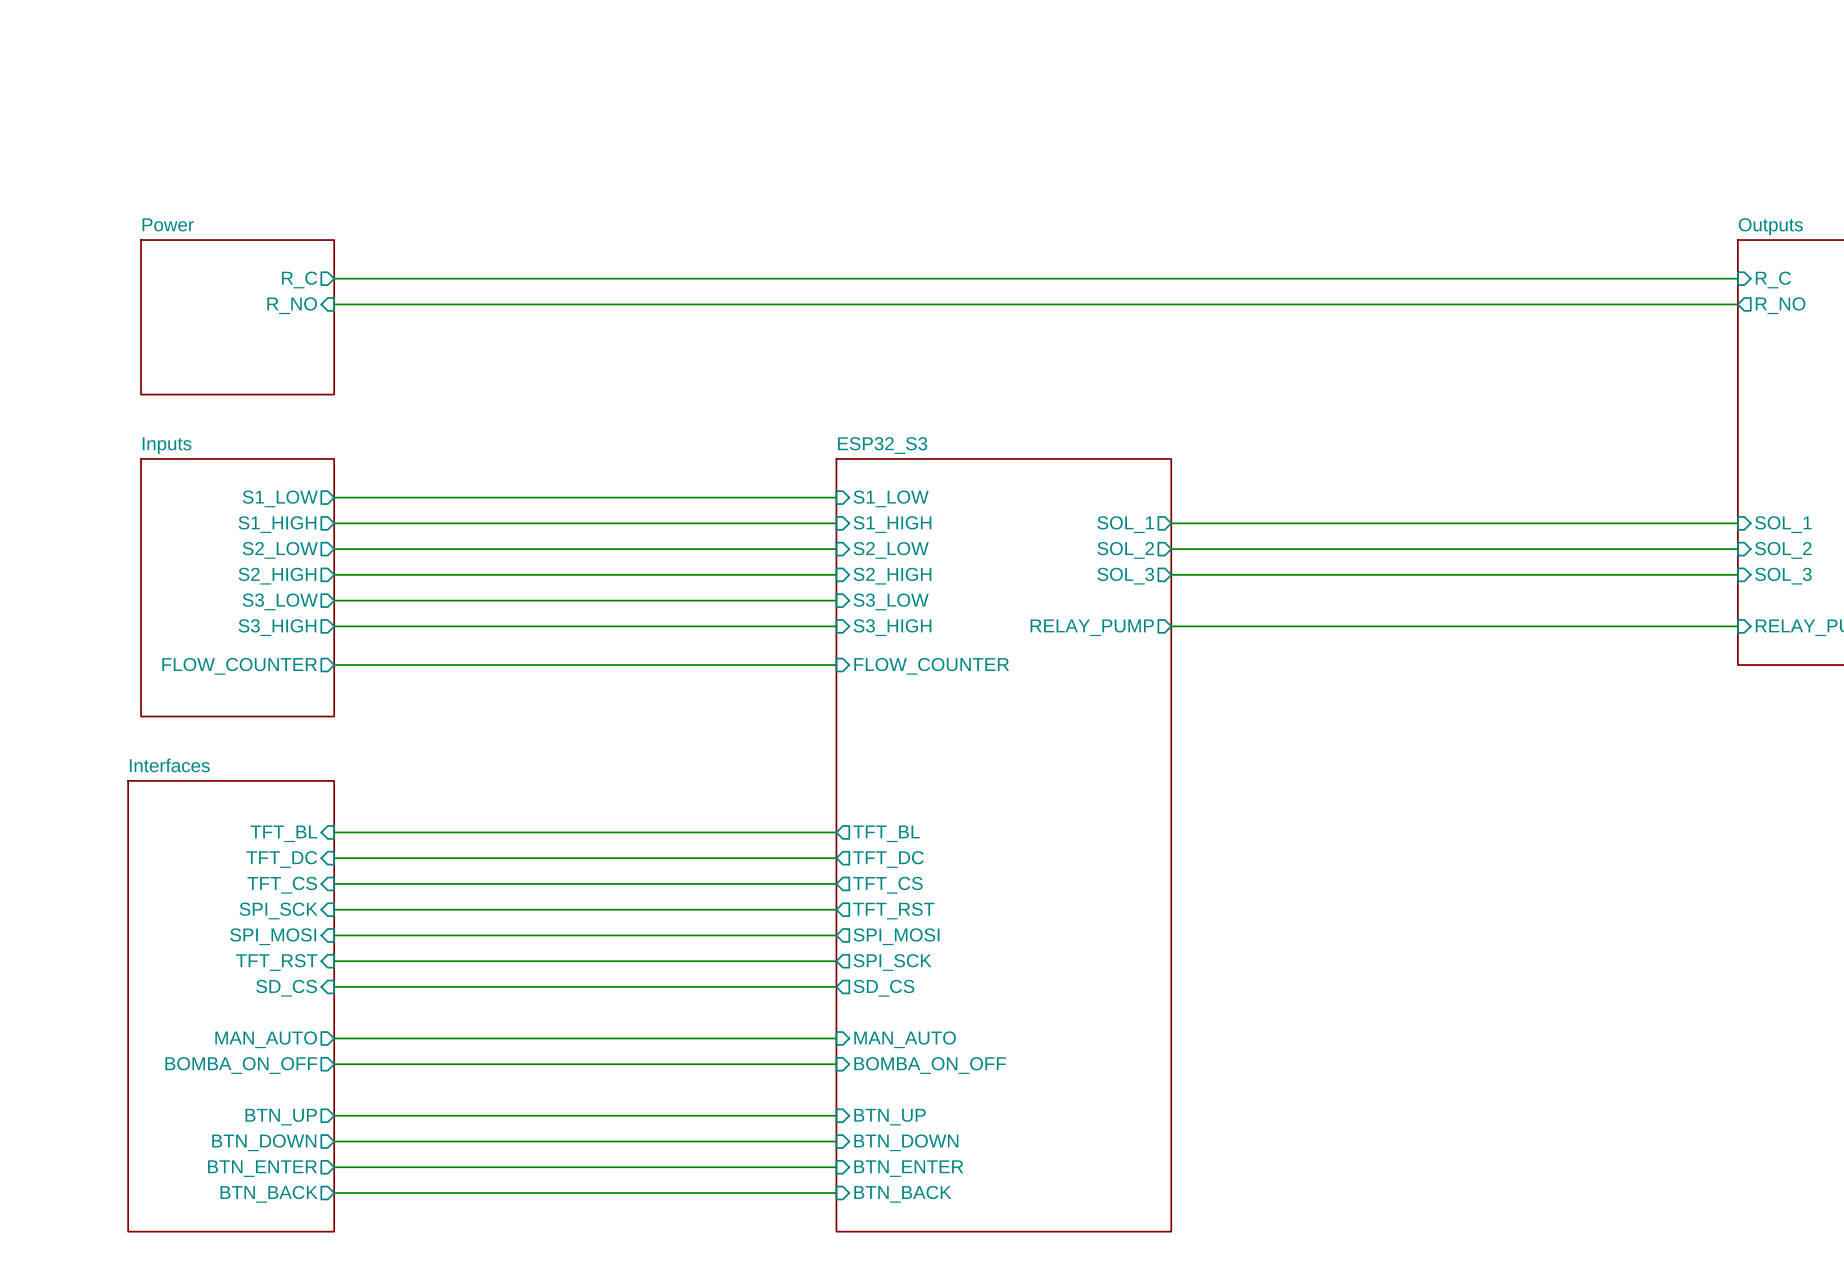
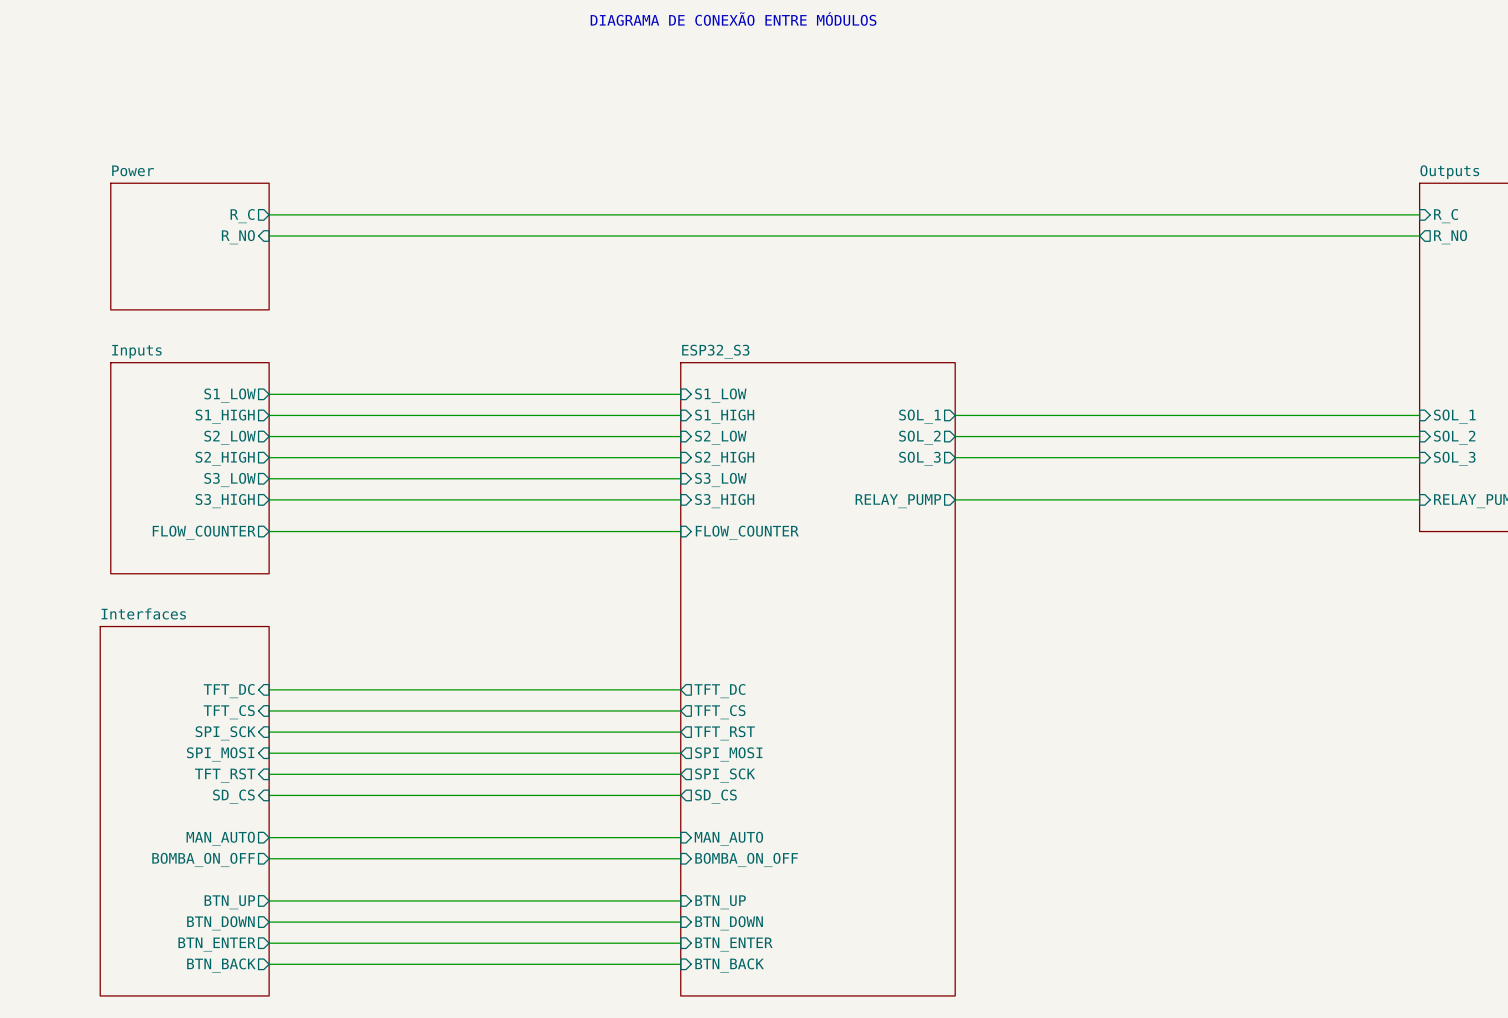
text: none -> DIAGRAMA DE CONEXÃO ENTRE MÓDULOS (733, 19)
wire: (334, 832) (836, 832) -> none
sheet pin: TFT_BL (283, 833) -> none
sheet pin: TFT_BL (886, 833) -> none

